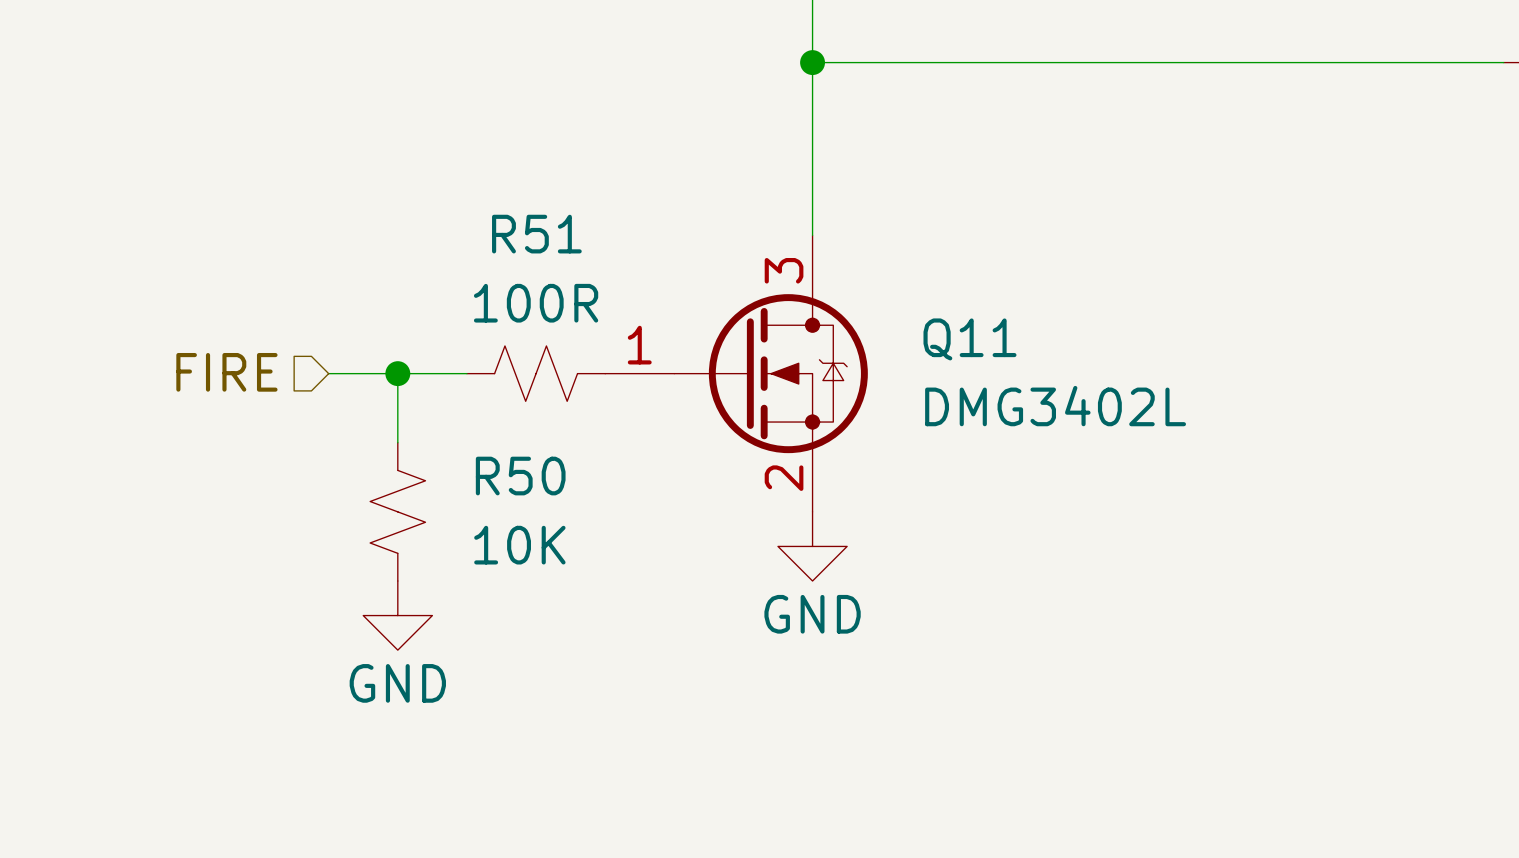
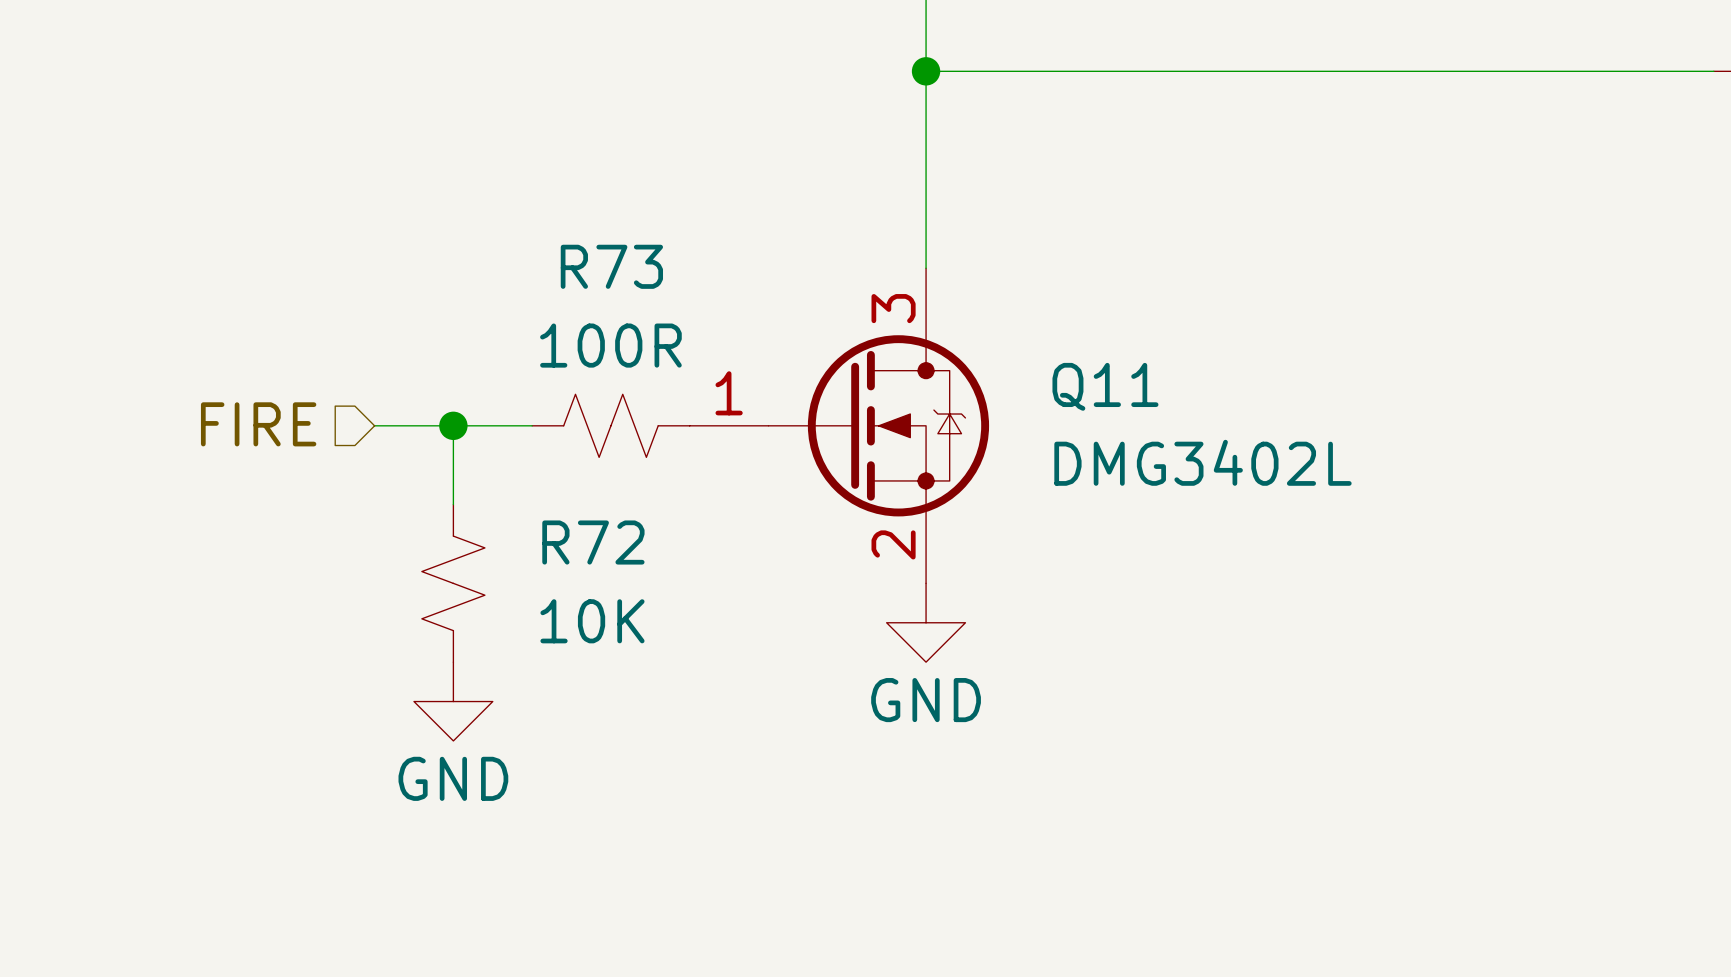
R51 name: R51 (536, 234) -> R73 (611, 266)
R50 name: R50 (520, 476) -> R72 (593, 542)

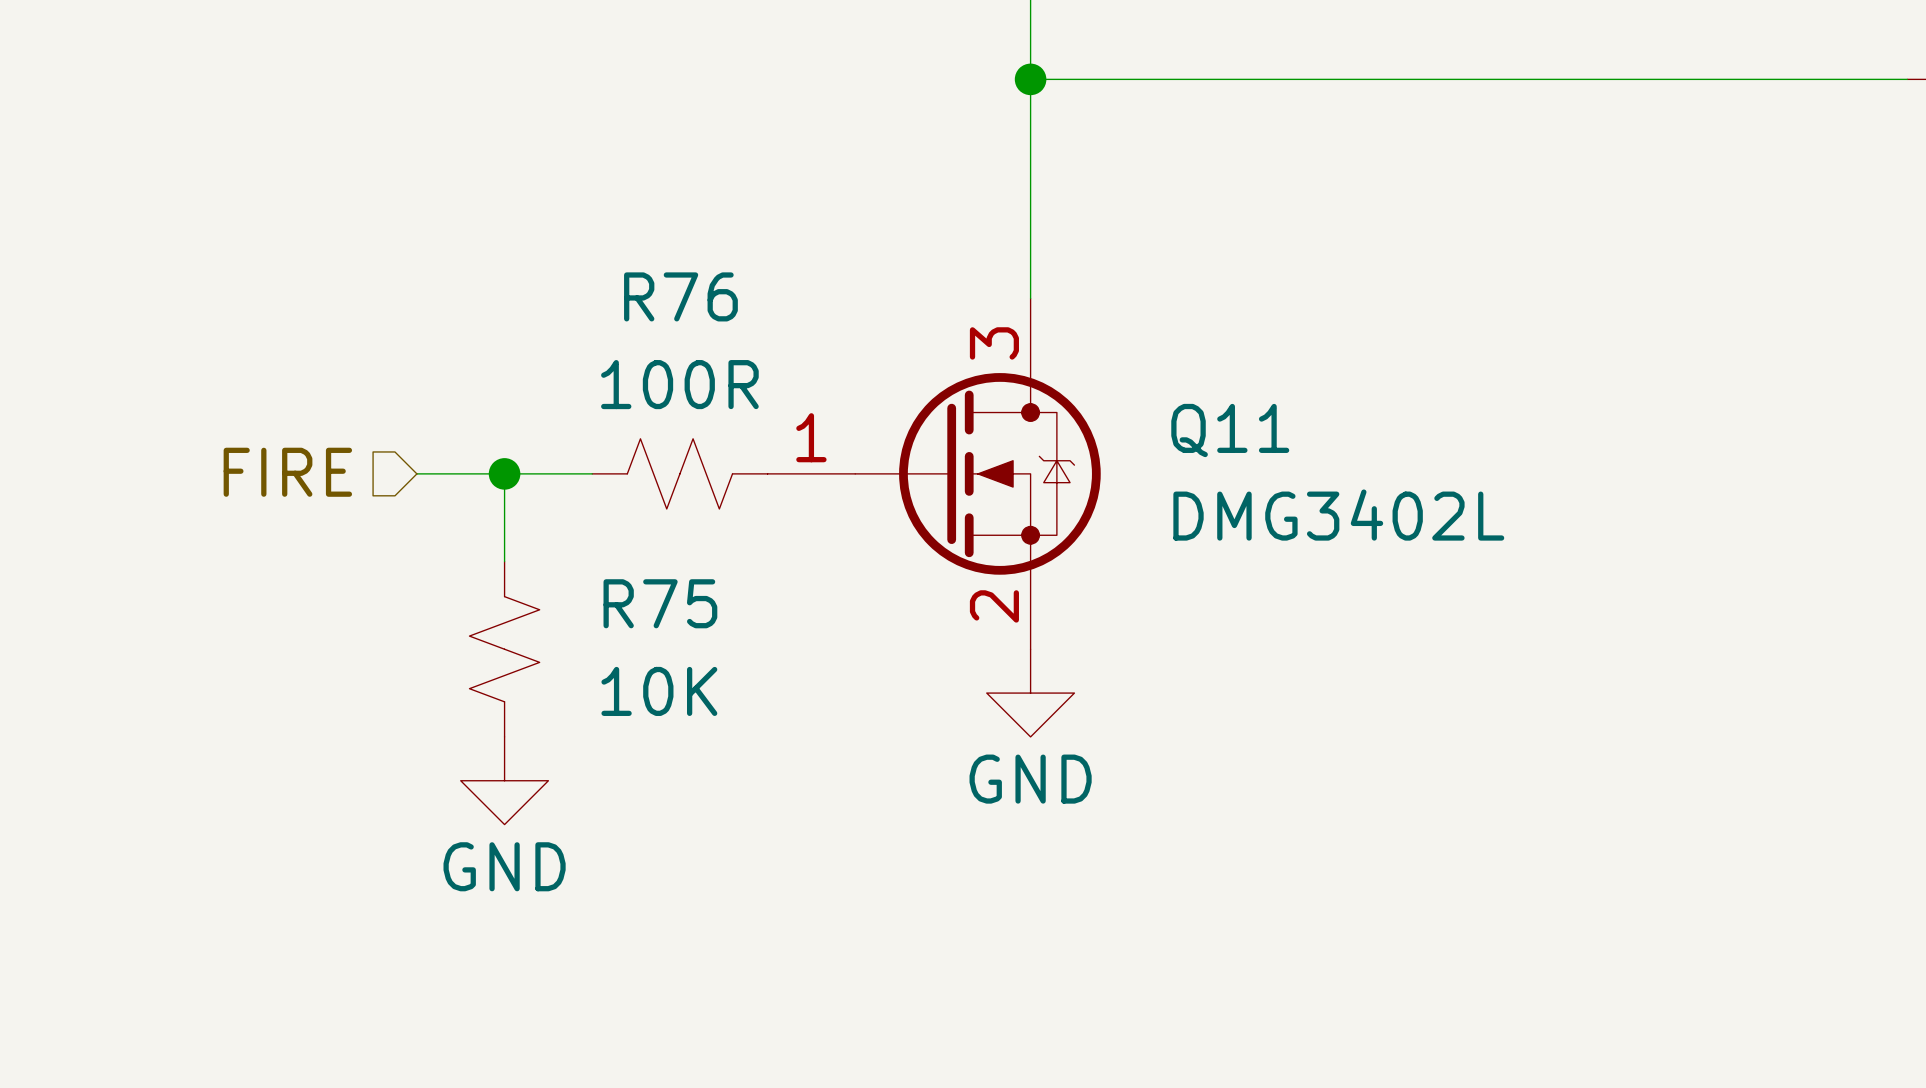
R73 name: R73 (611, 266) -> R76 (680, 296)
R72 name: R72 (593, 542) -> R75 (660, 603)

